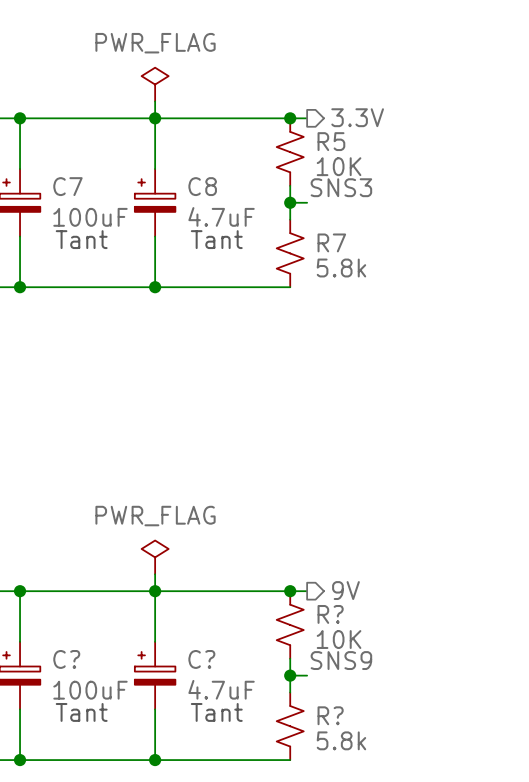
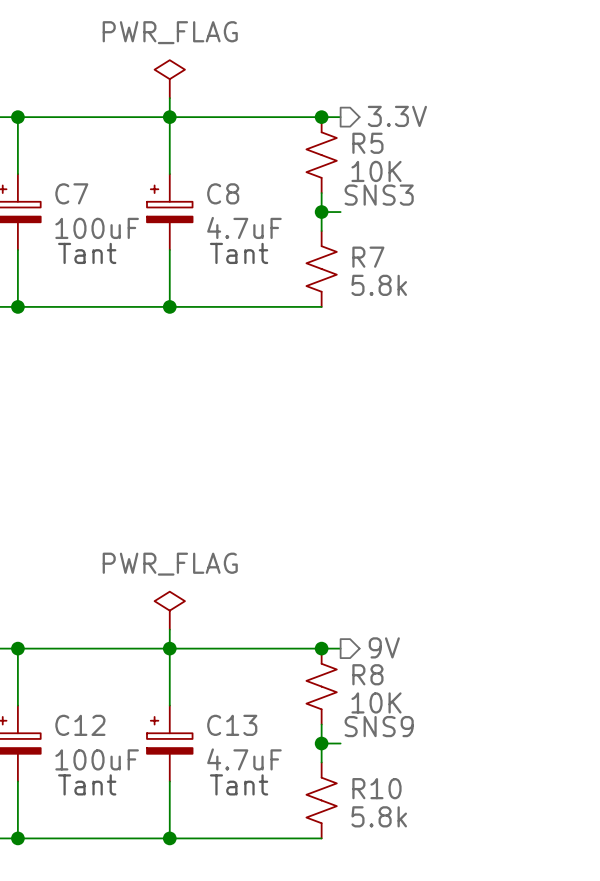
R? name: R? (330, 614) -> R8 (367, 674)
C? name: C? (66, 659) -> C12 (80, 725)
C? name: C? (201, 659) -> C13 (232, 725)
R? name: R? (330, 715) -> R10 (376, 788)

